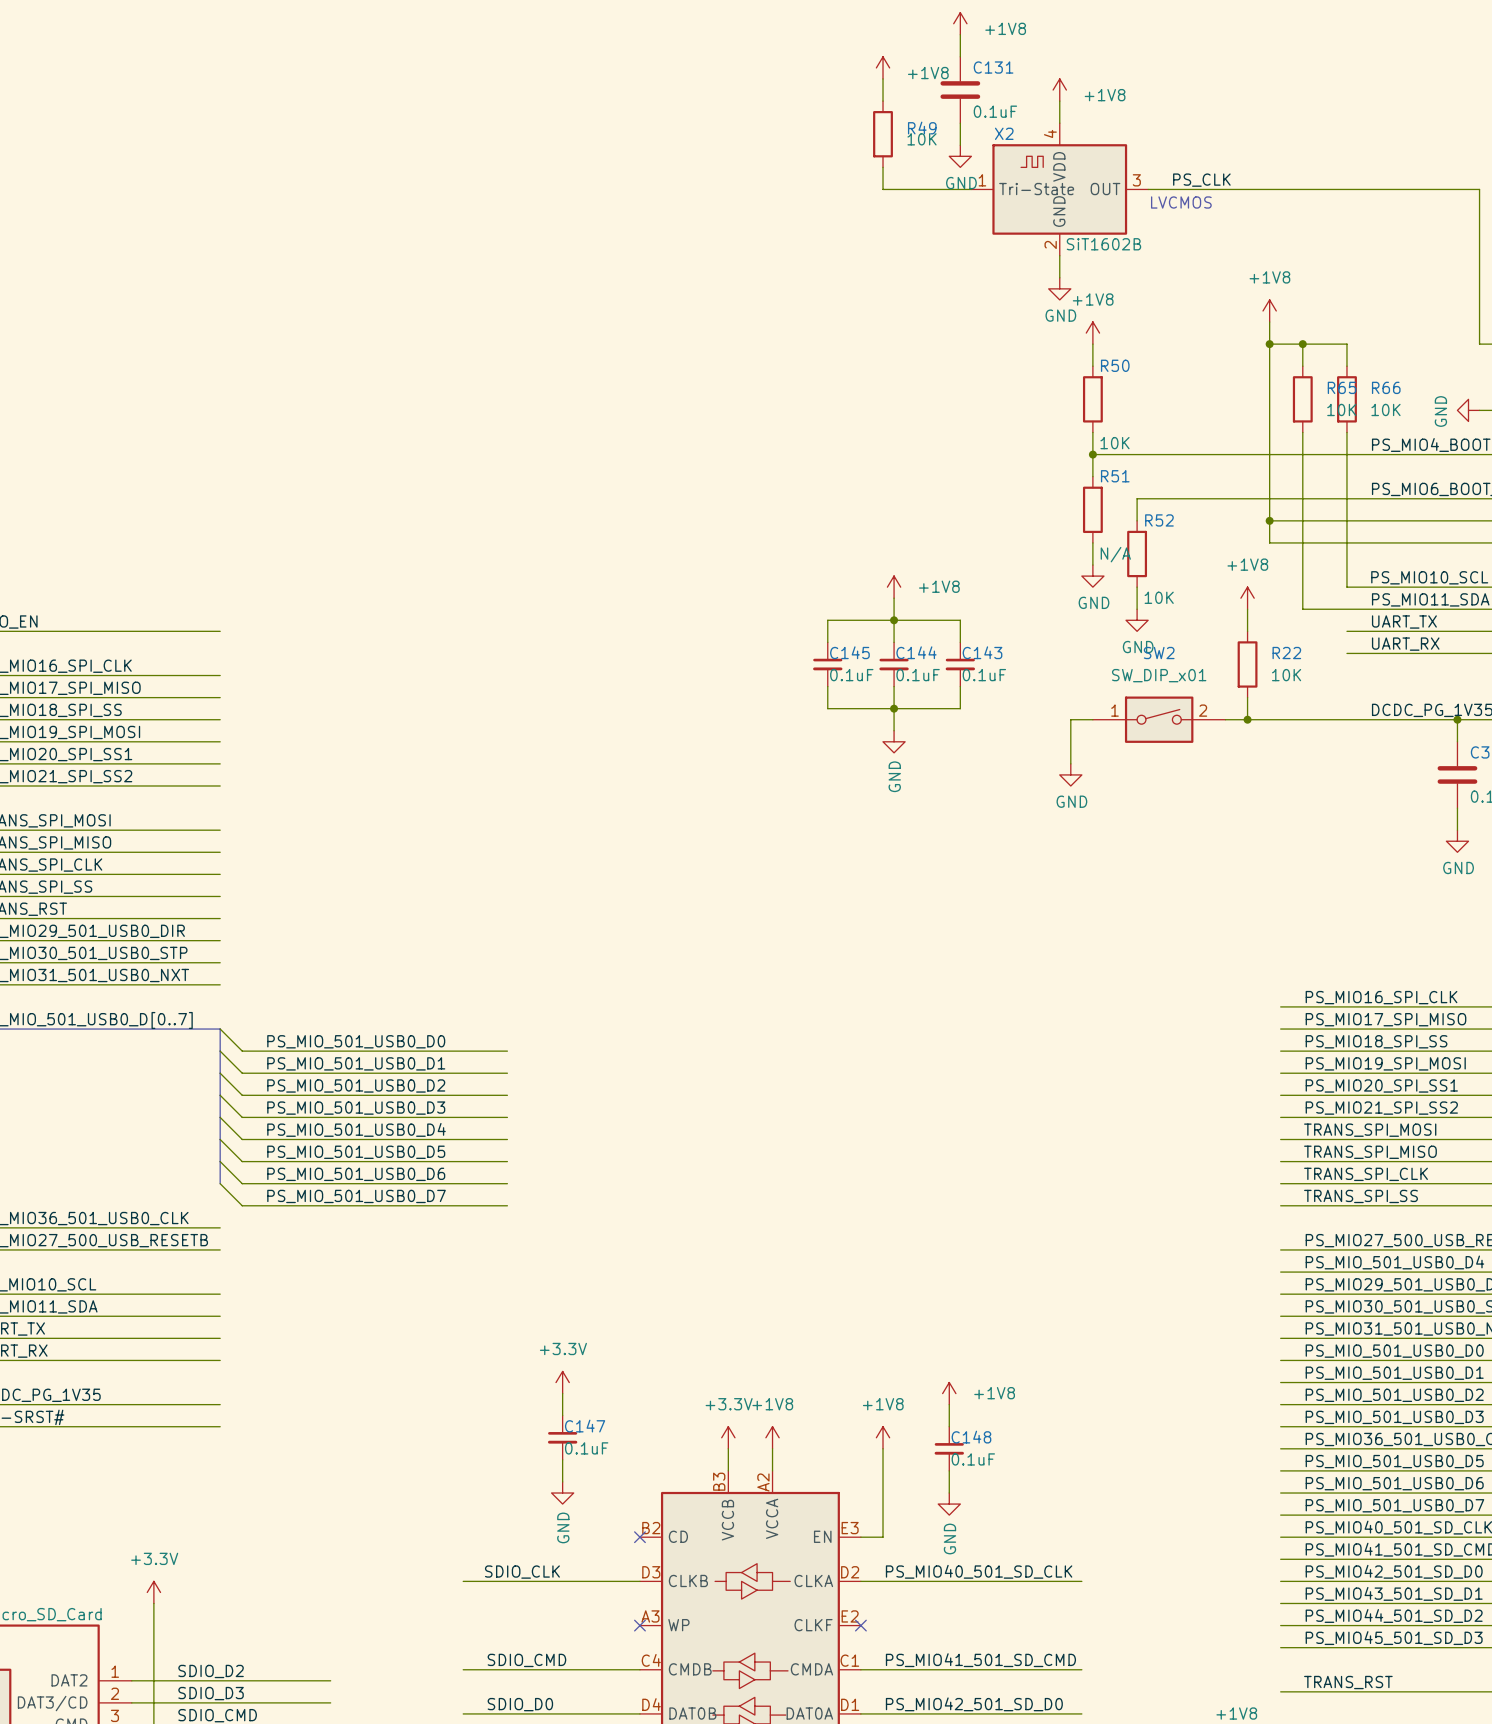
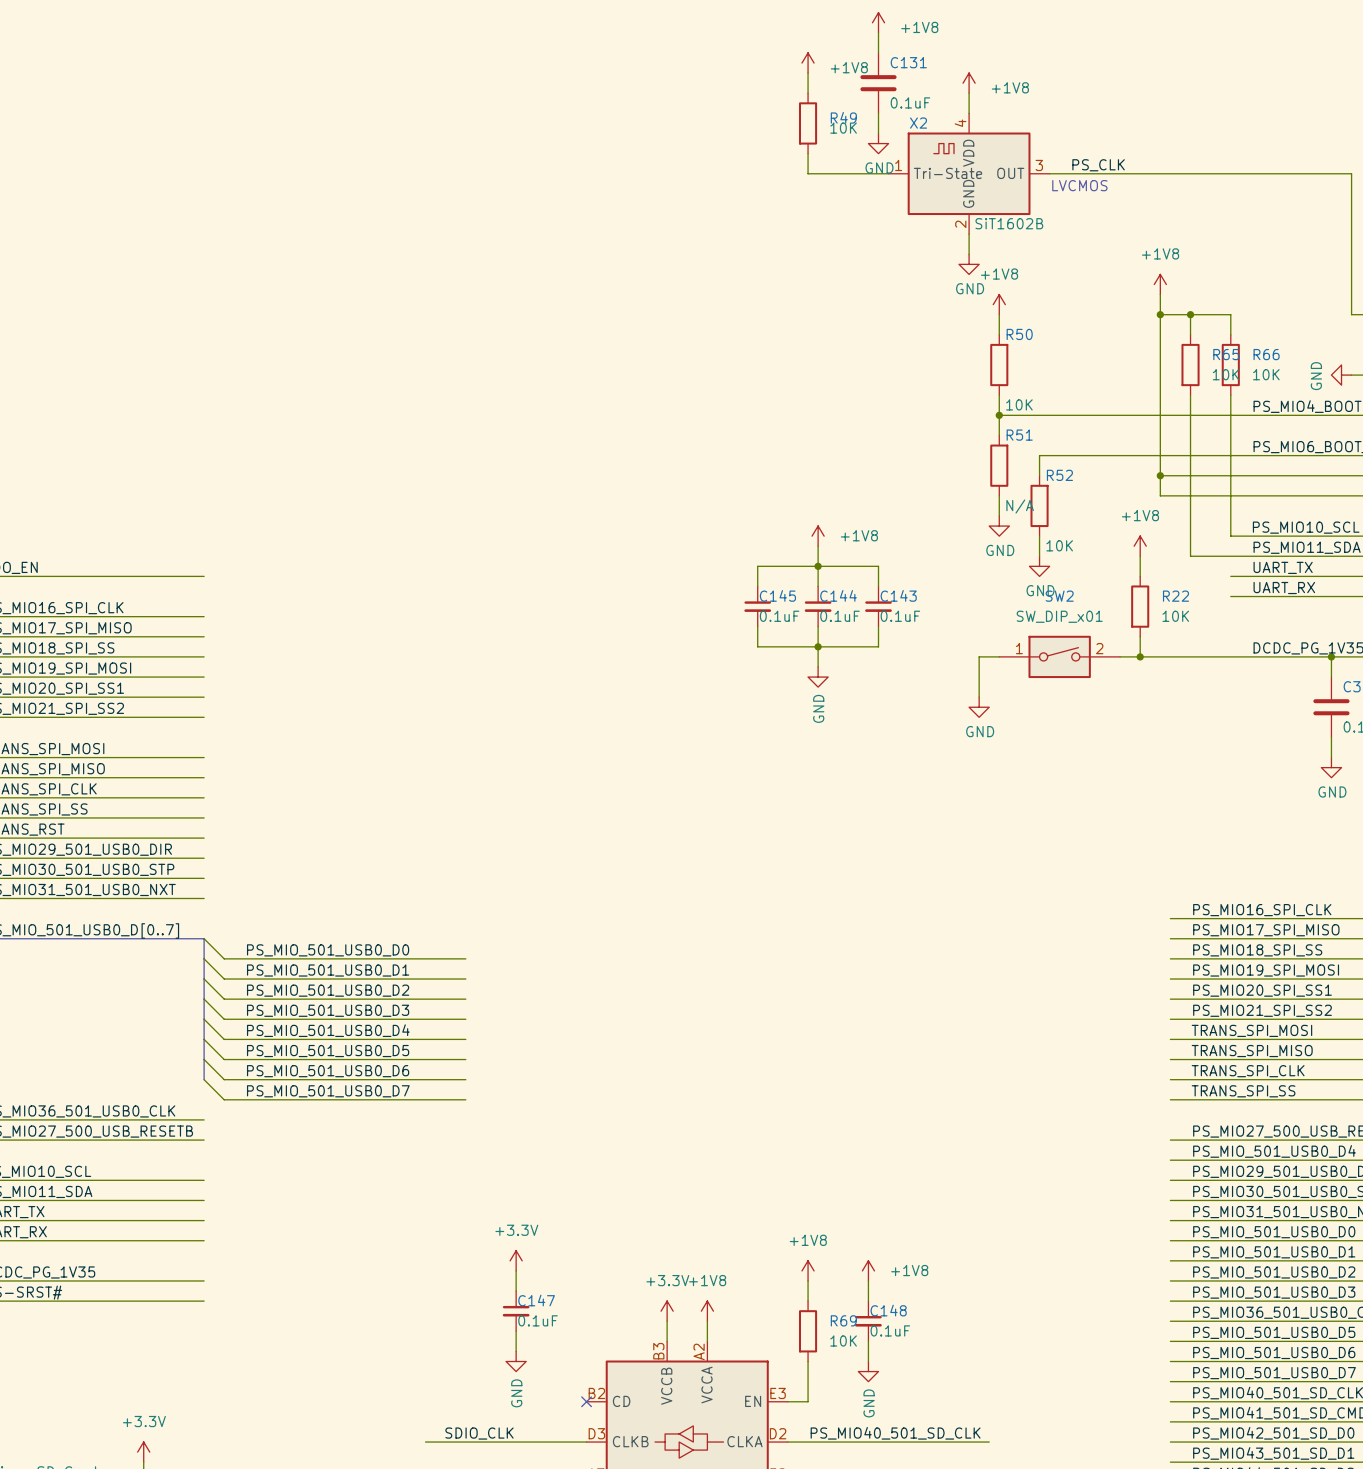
wire: none -> (808, 1280) (808, 1301)
power symbol position: +1V8 (883, 1437) -> +1V8 (808, 1270)
wire: (883, 1448) (883, 1493) -> none
R69: none -> 10K (808, 1331)

